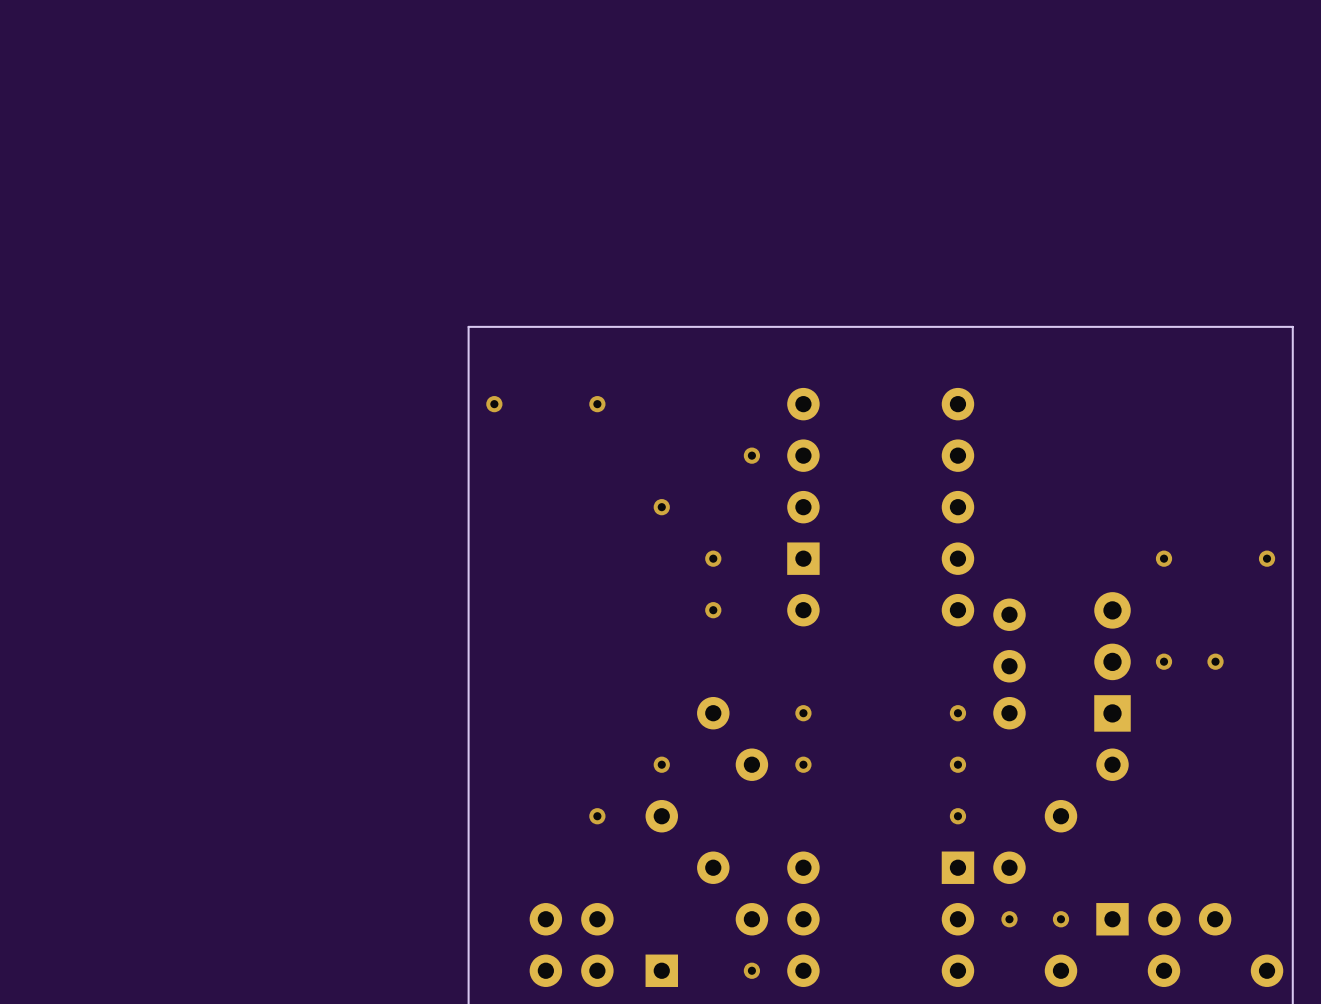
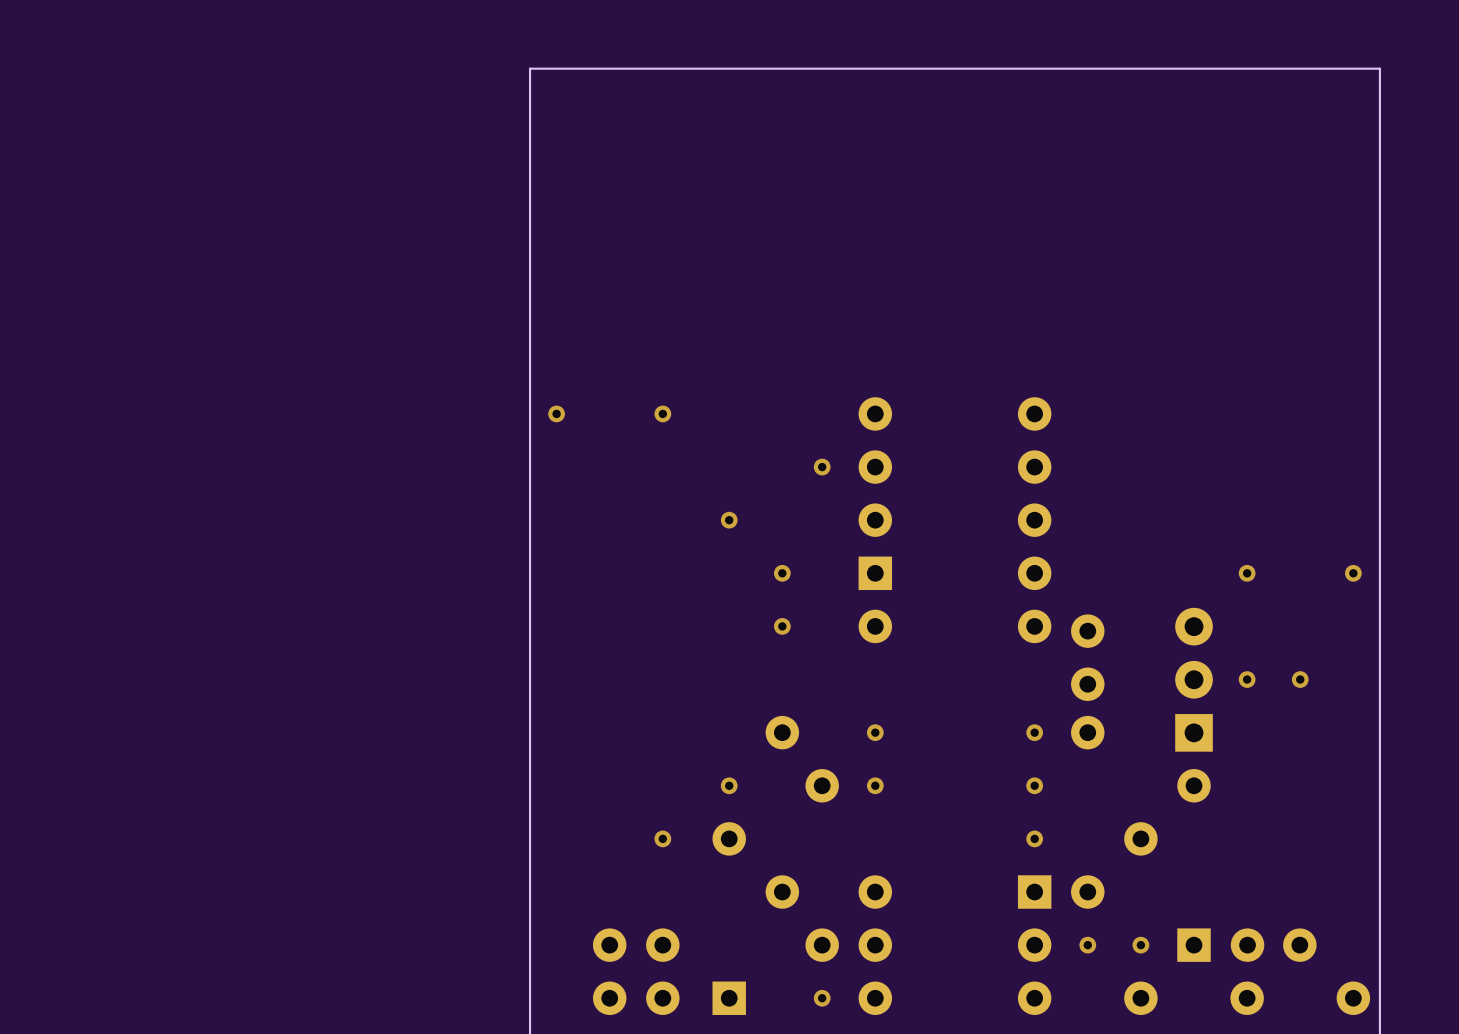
board edge: (1292, 326) (468, 326) -> (1379, 334) (1379, 68) (530, 68) (530, 334)

